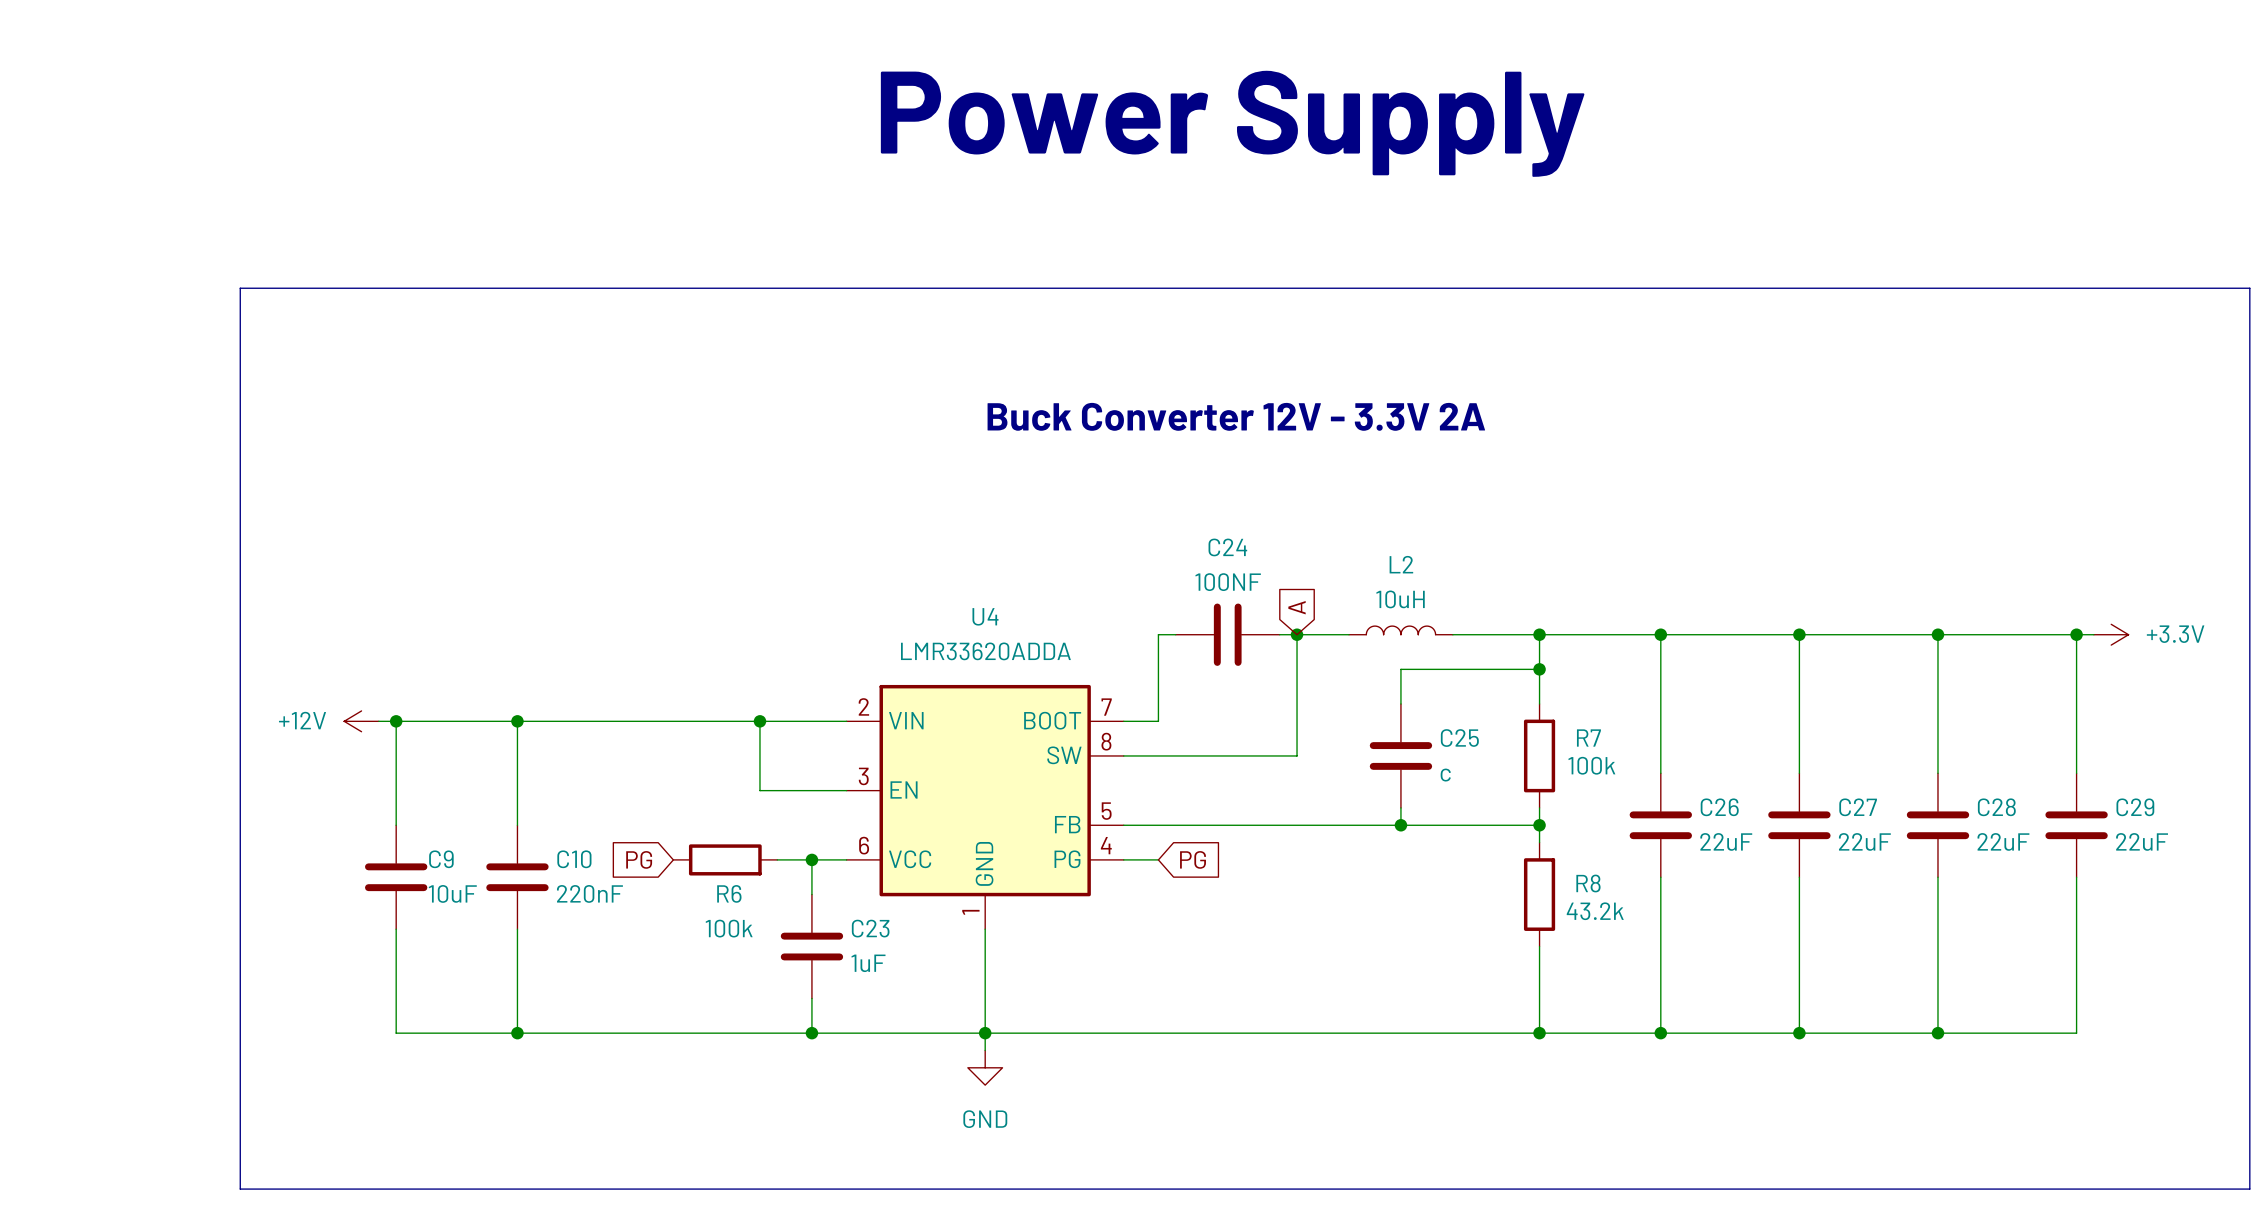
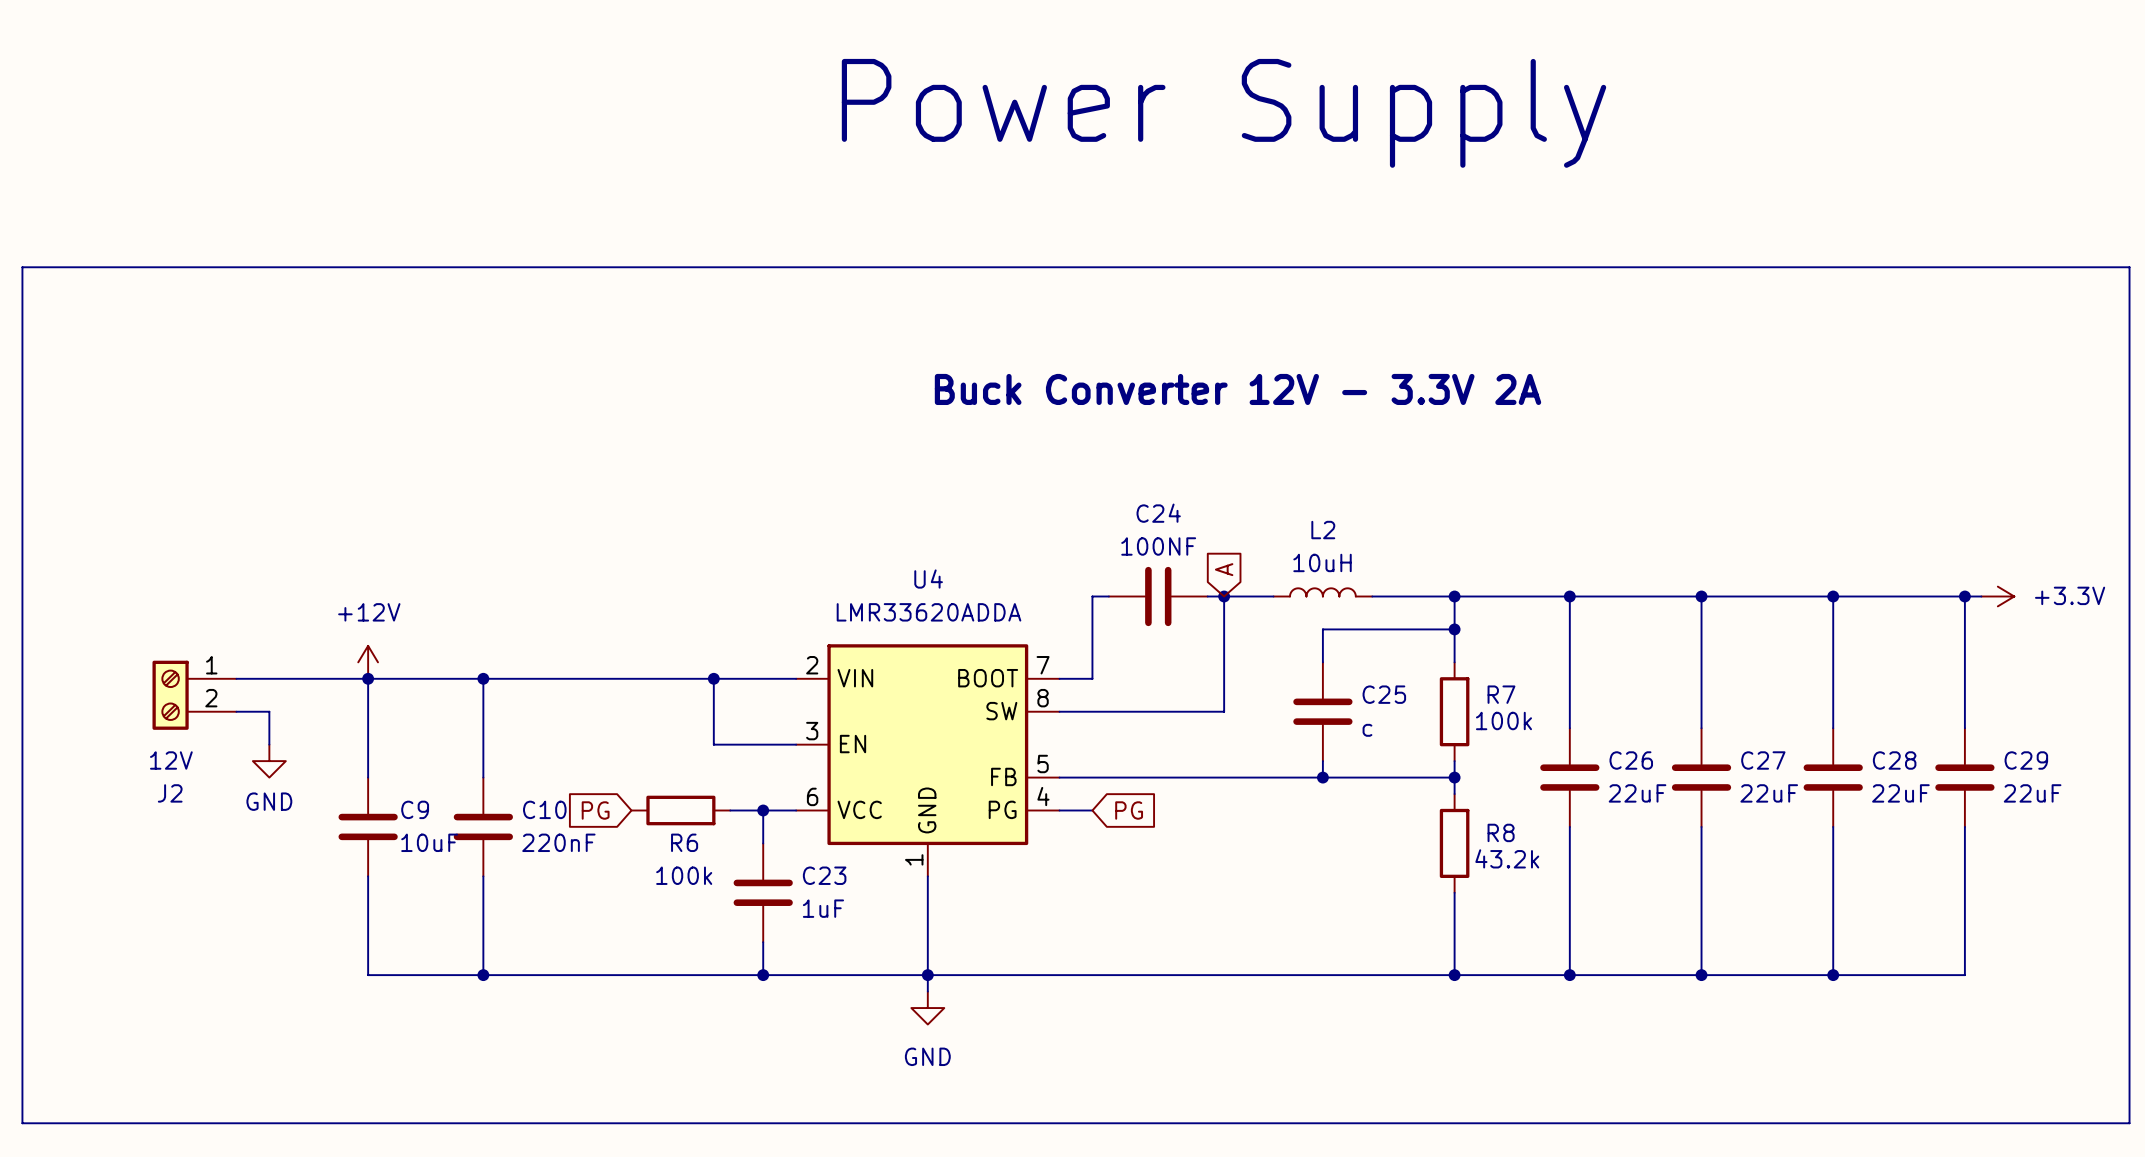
line: (240, 288) (240, 1189) -> (219, 267) (22, 267) (22, 1123) (219, 1123)
wire: none -> (236, 678) (351, 678)
power symbol rotation: 0° (361, 721) -> 90° clockwise (368, 662)
power symbol position: +12V (361, 721) -> +12V (368, 662)
J2: none -> 12V (194, 695)
wire: none -> (236, 711) (269, 711) (269, 744)
power symbol: none -> GND (269, 761)

